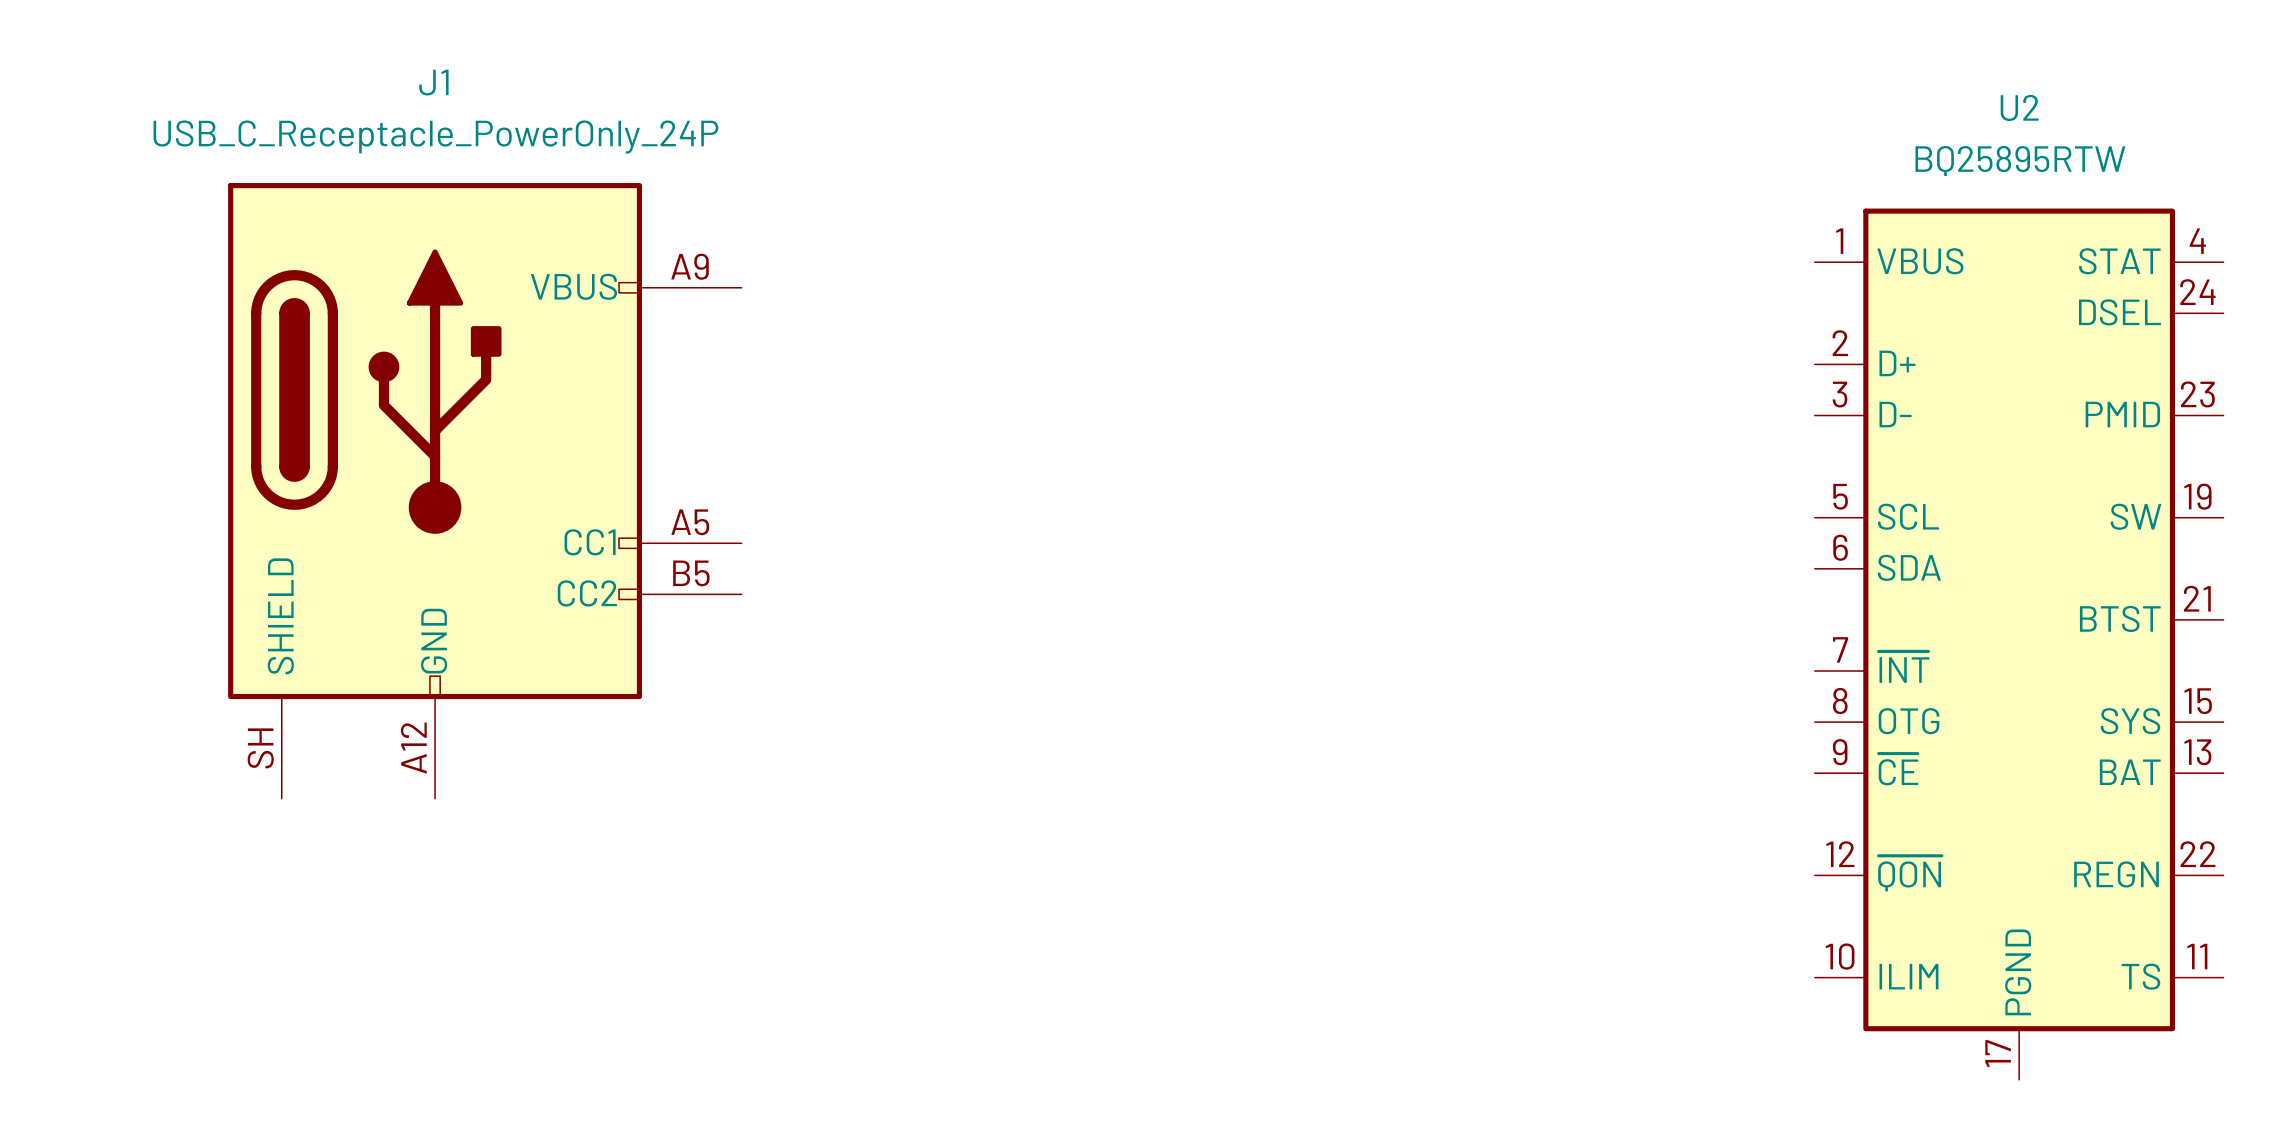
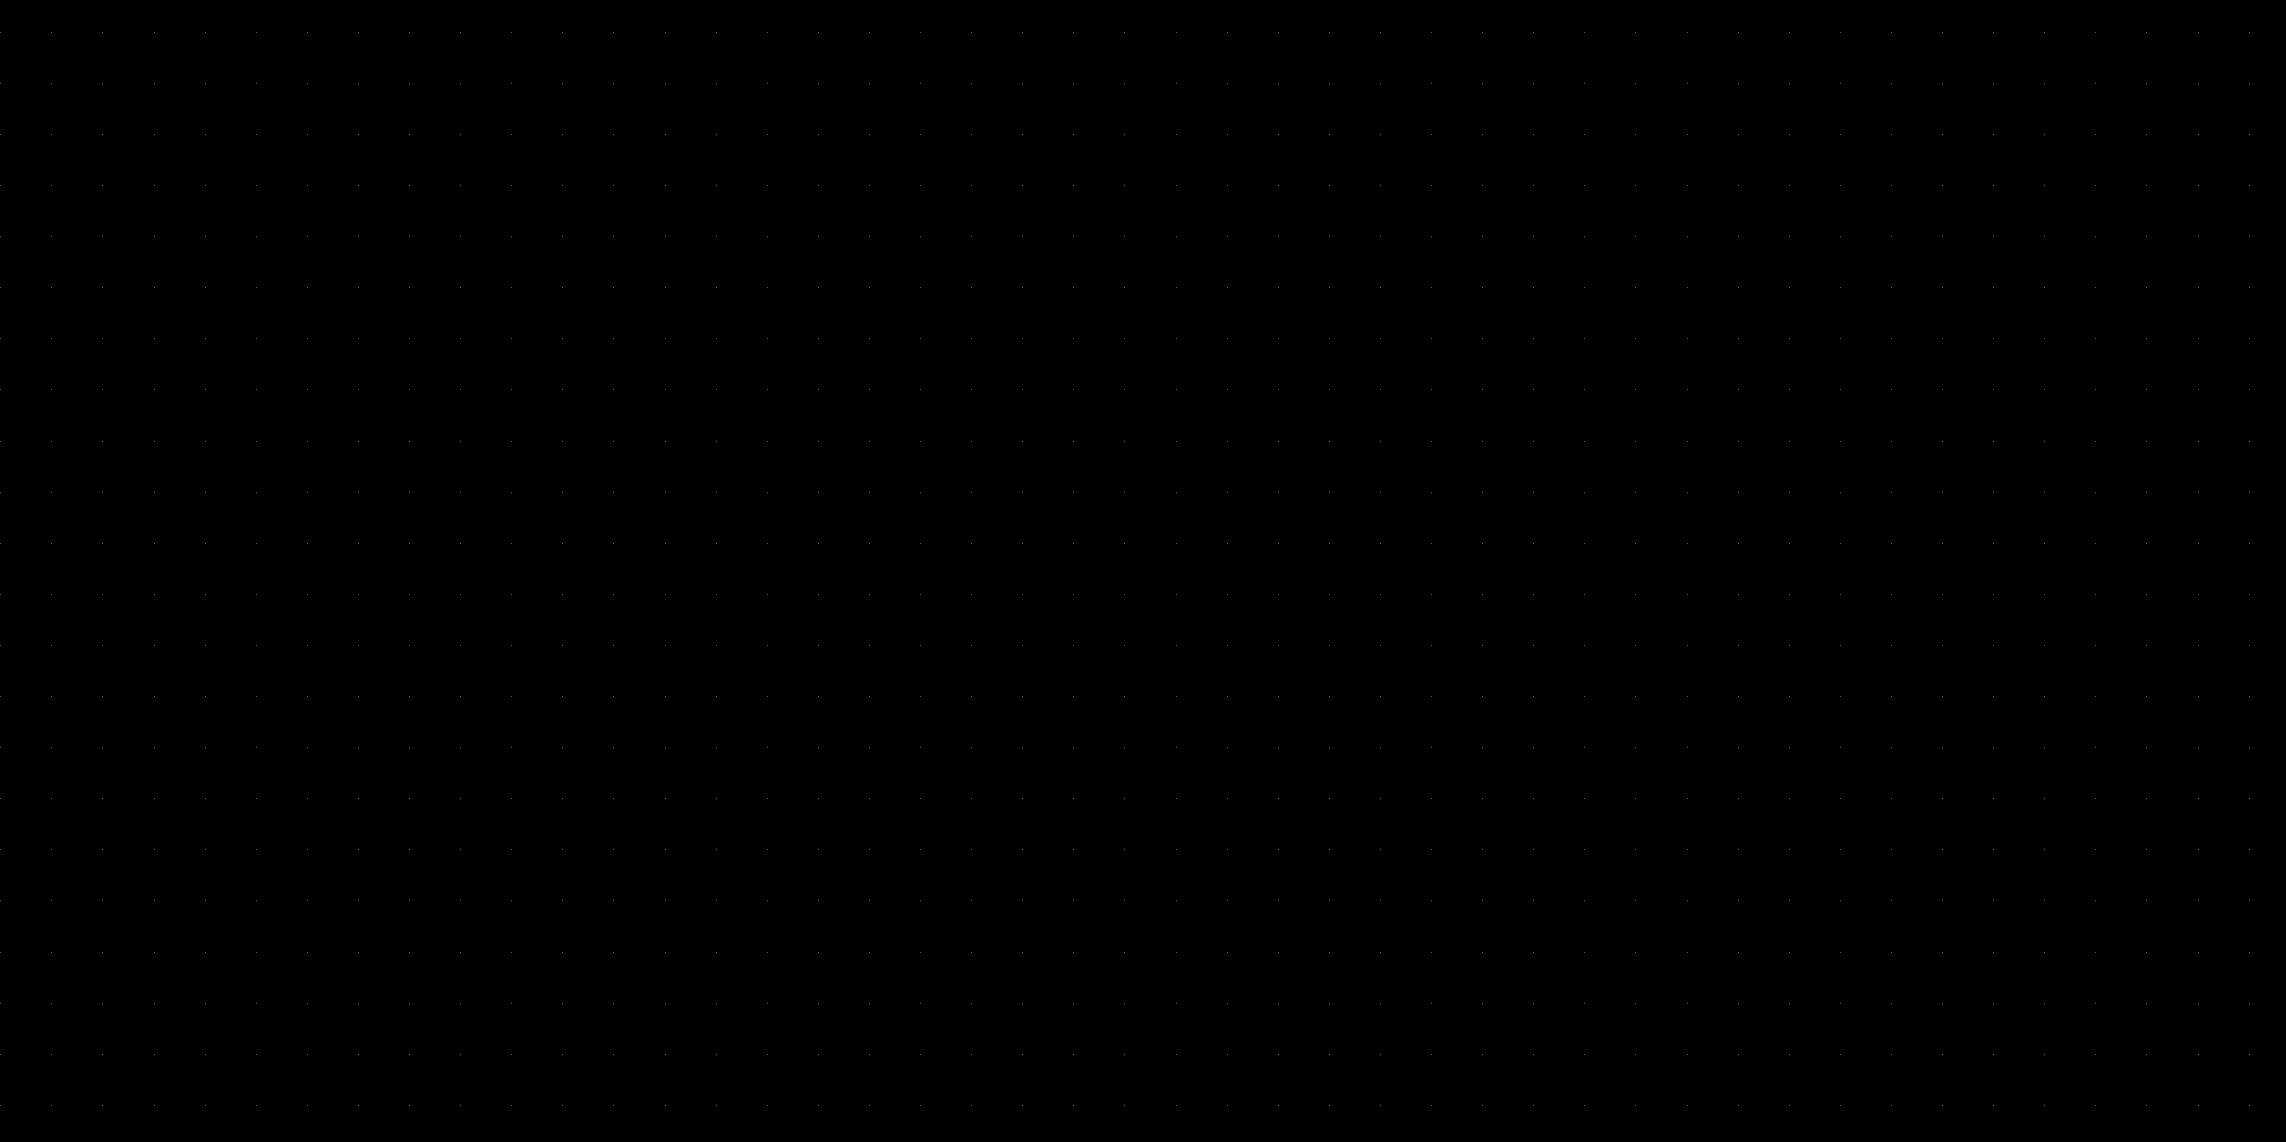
J1: USB_C_Receptacle_PowerOnly_24P (484, 490) -> none
U2: BQ25895RTW (2019, 644) -> none

